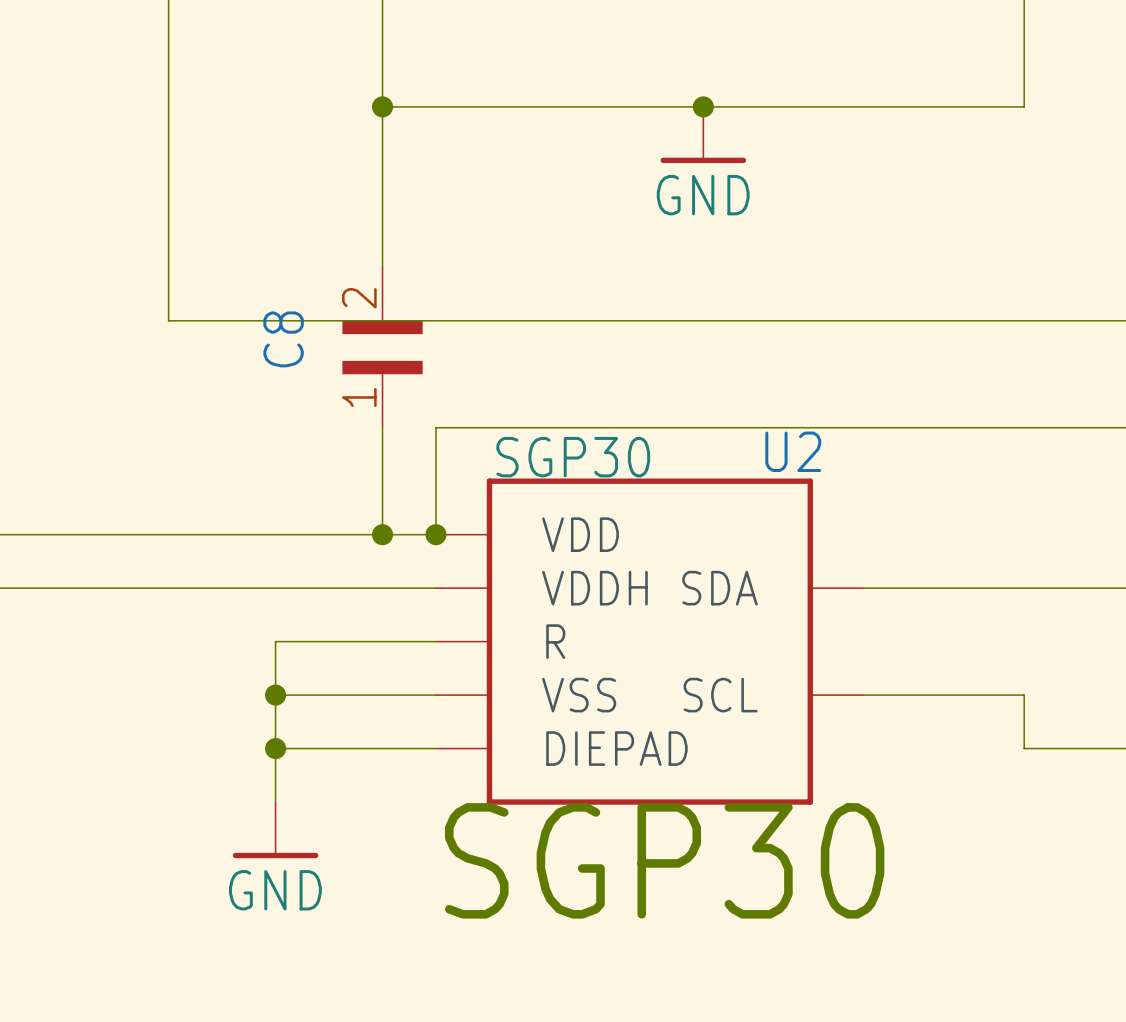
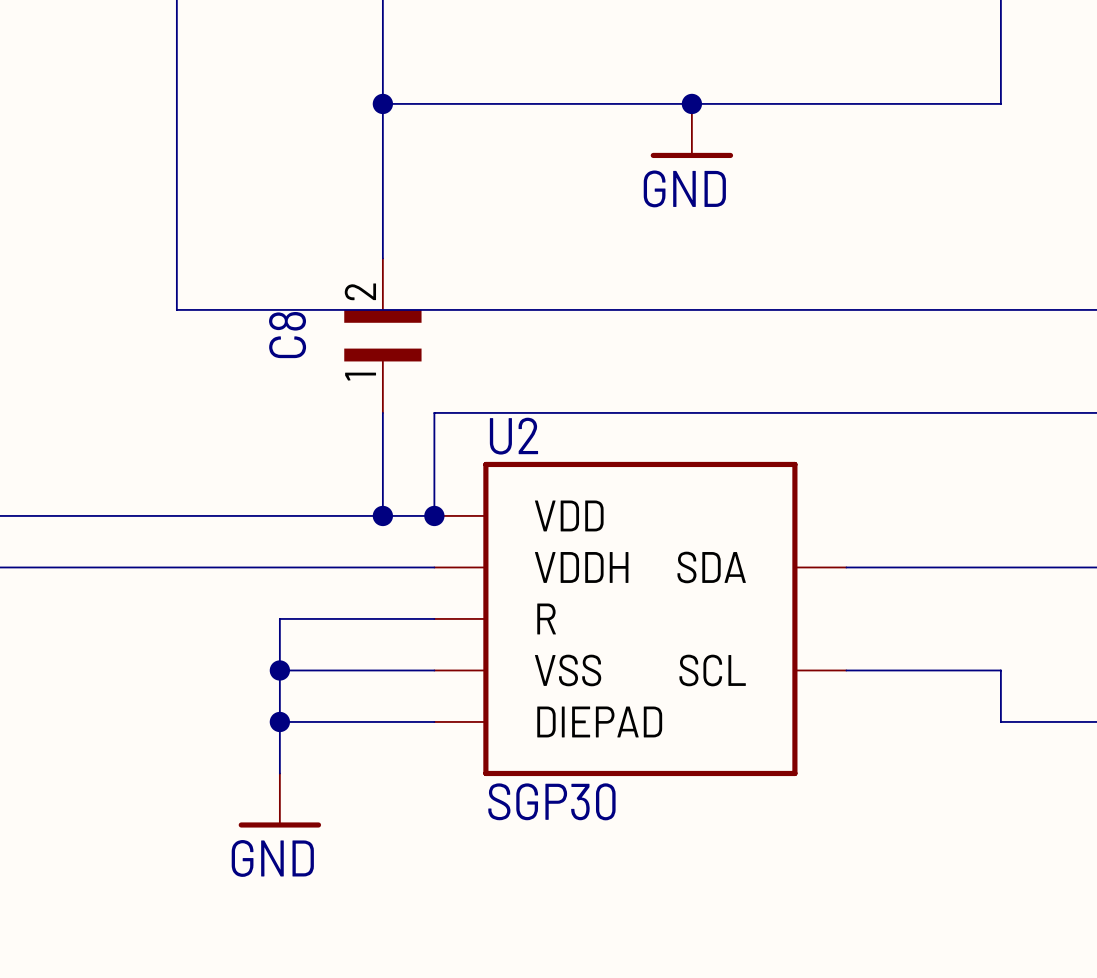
U2 name position: U2 (793, 451) -> U2 (513, 436)
U2 value position: SGP30 (573, 457) -> SGP30 (551, 801)
text: SGP30 (664, 860) -> none

